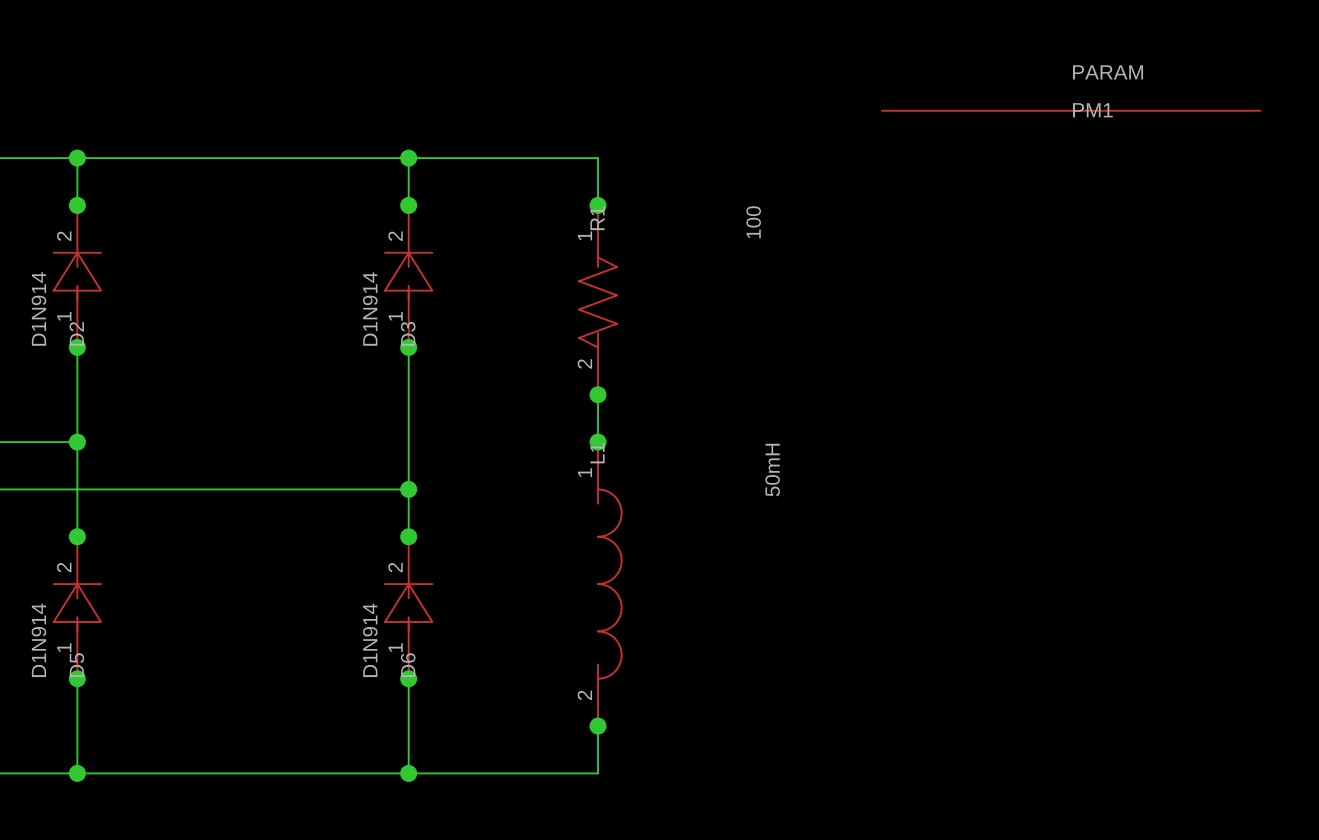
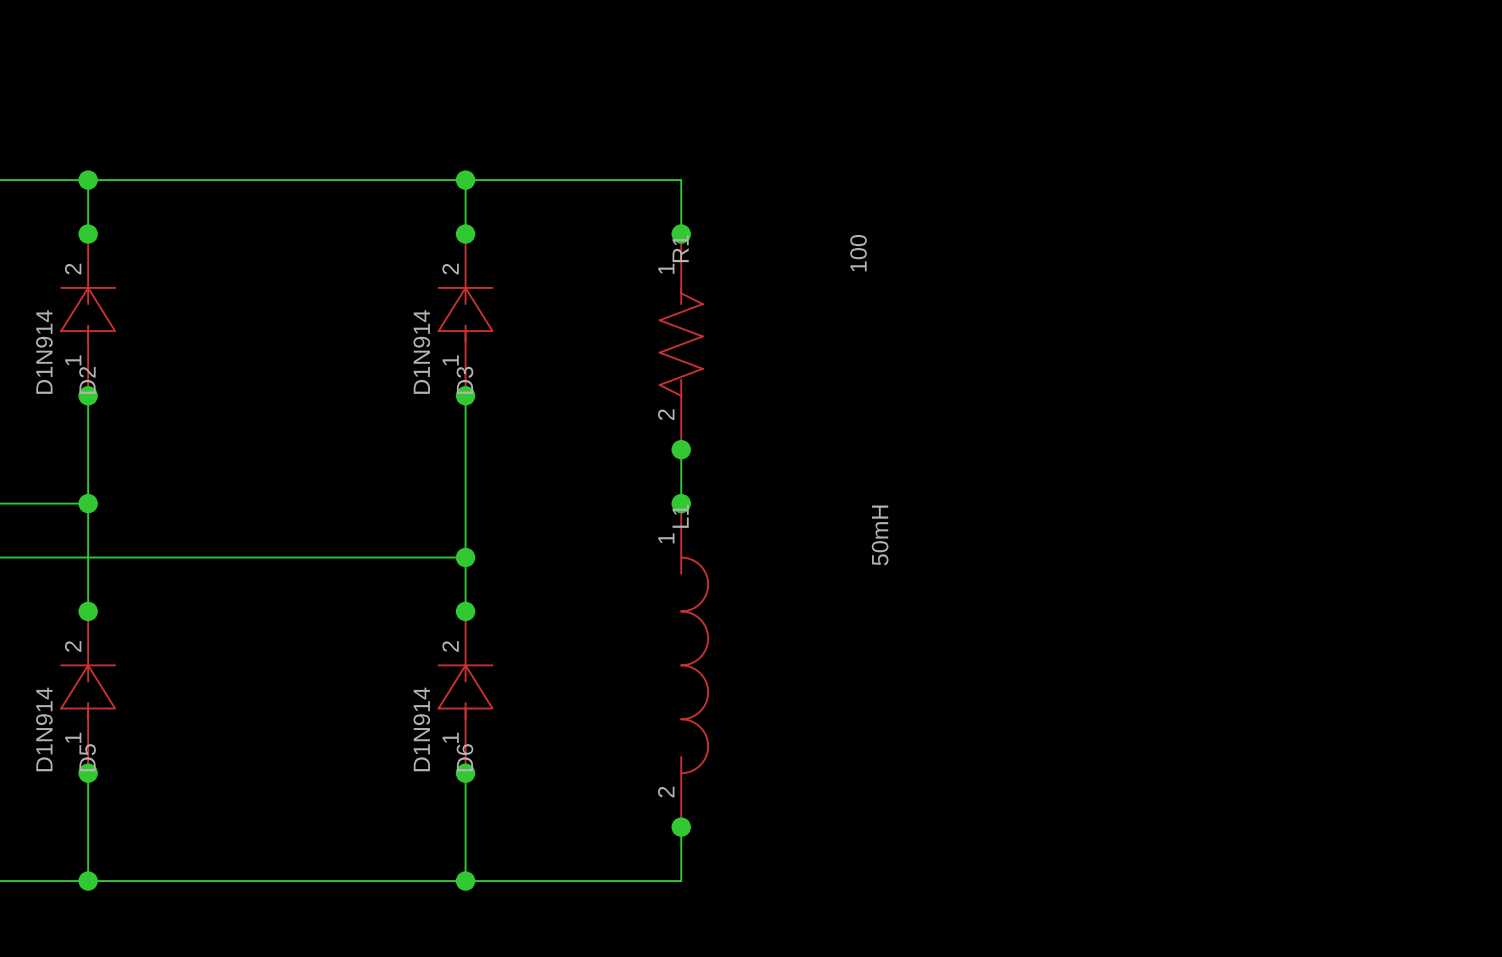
PM1: PARAM (1071, 110) -> none

